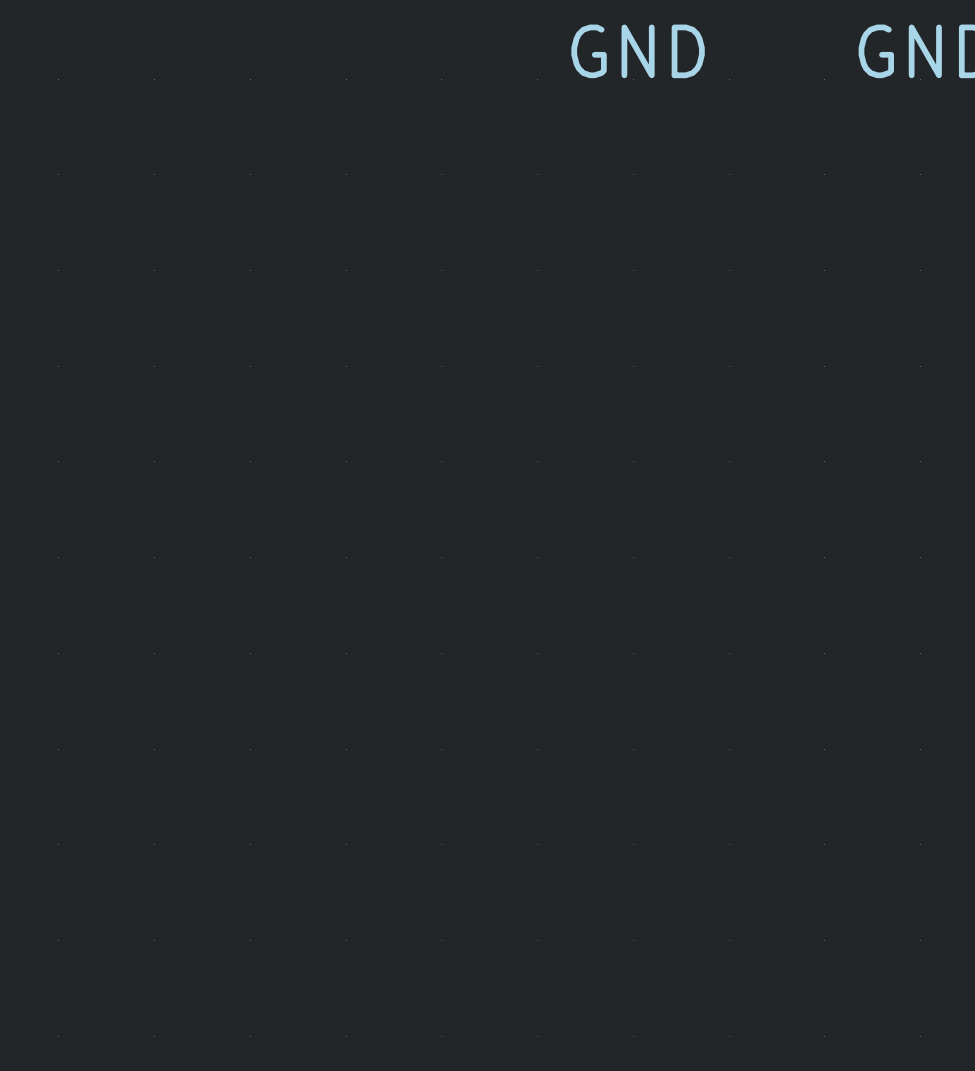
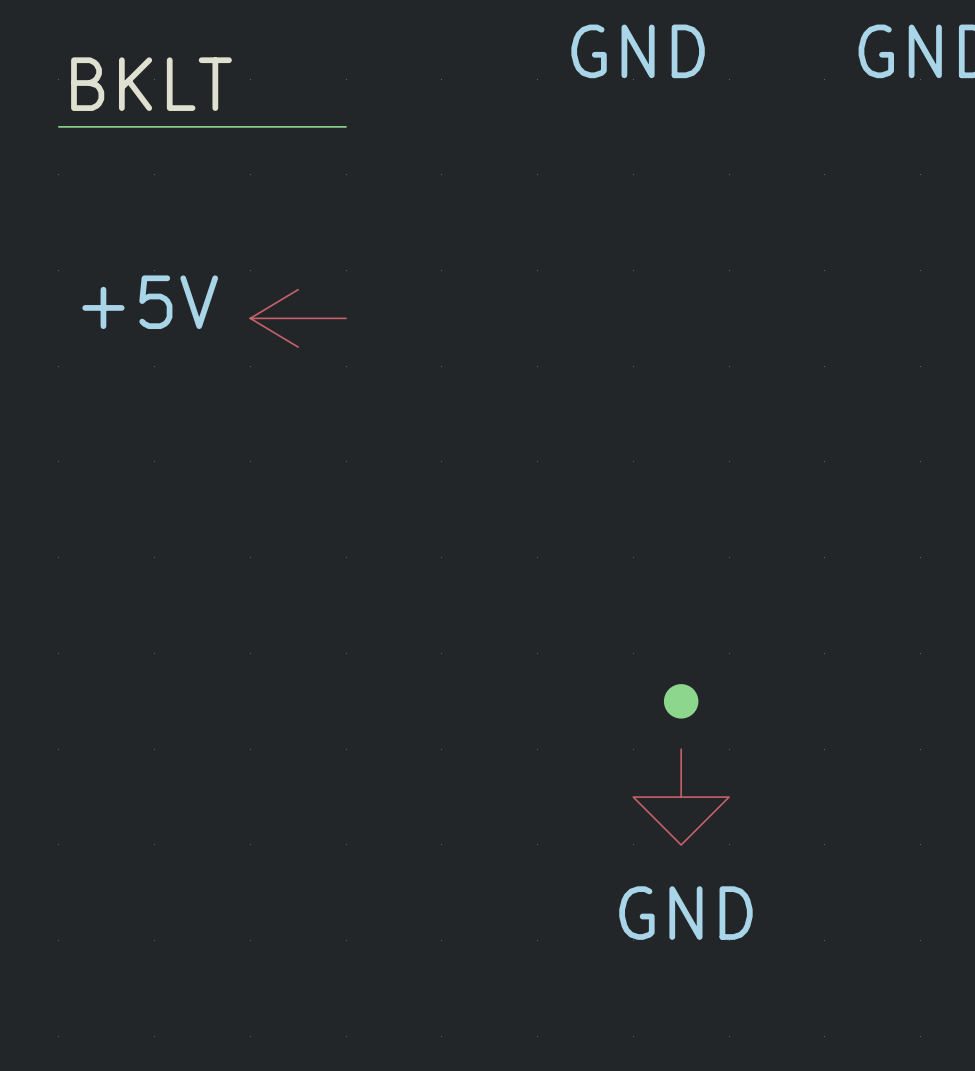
label: none -> BKLT (151, 84)
wire: none -> (58, 126) (346, 126)
power symbol: none -> +5V (298, 318)
junction: none -> (681, 701)
power symbol: none -> GND (681, 797)

